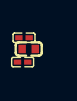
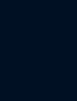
part: (24, 37) -> none
part: (28, 48) -> none
part: (22, 62) -> none

